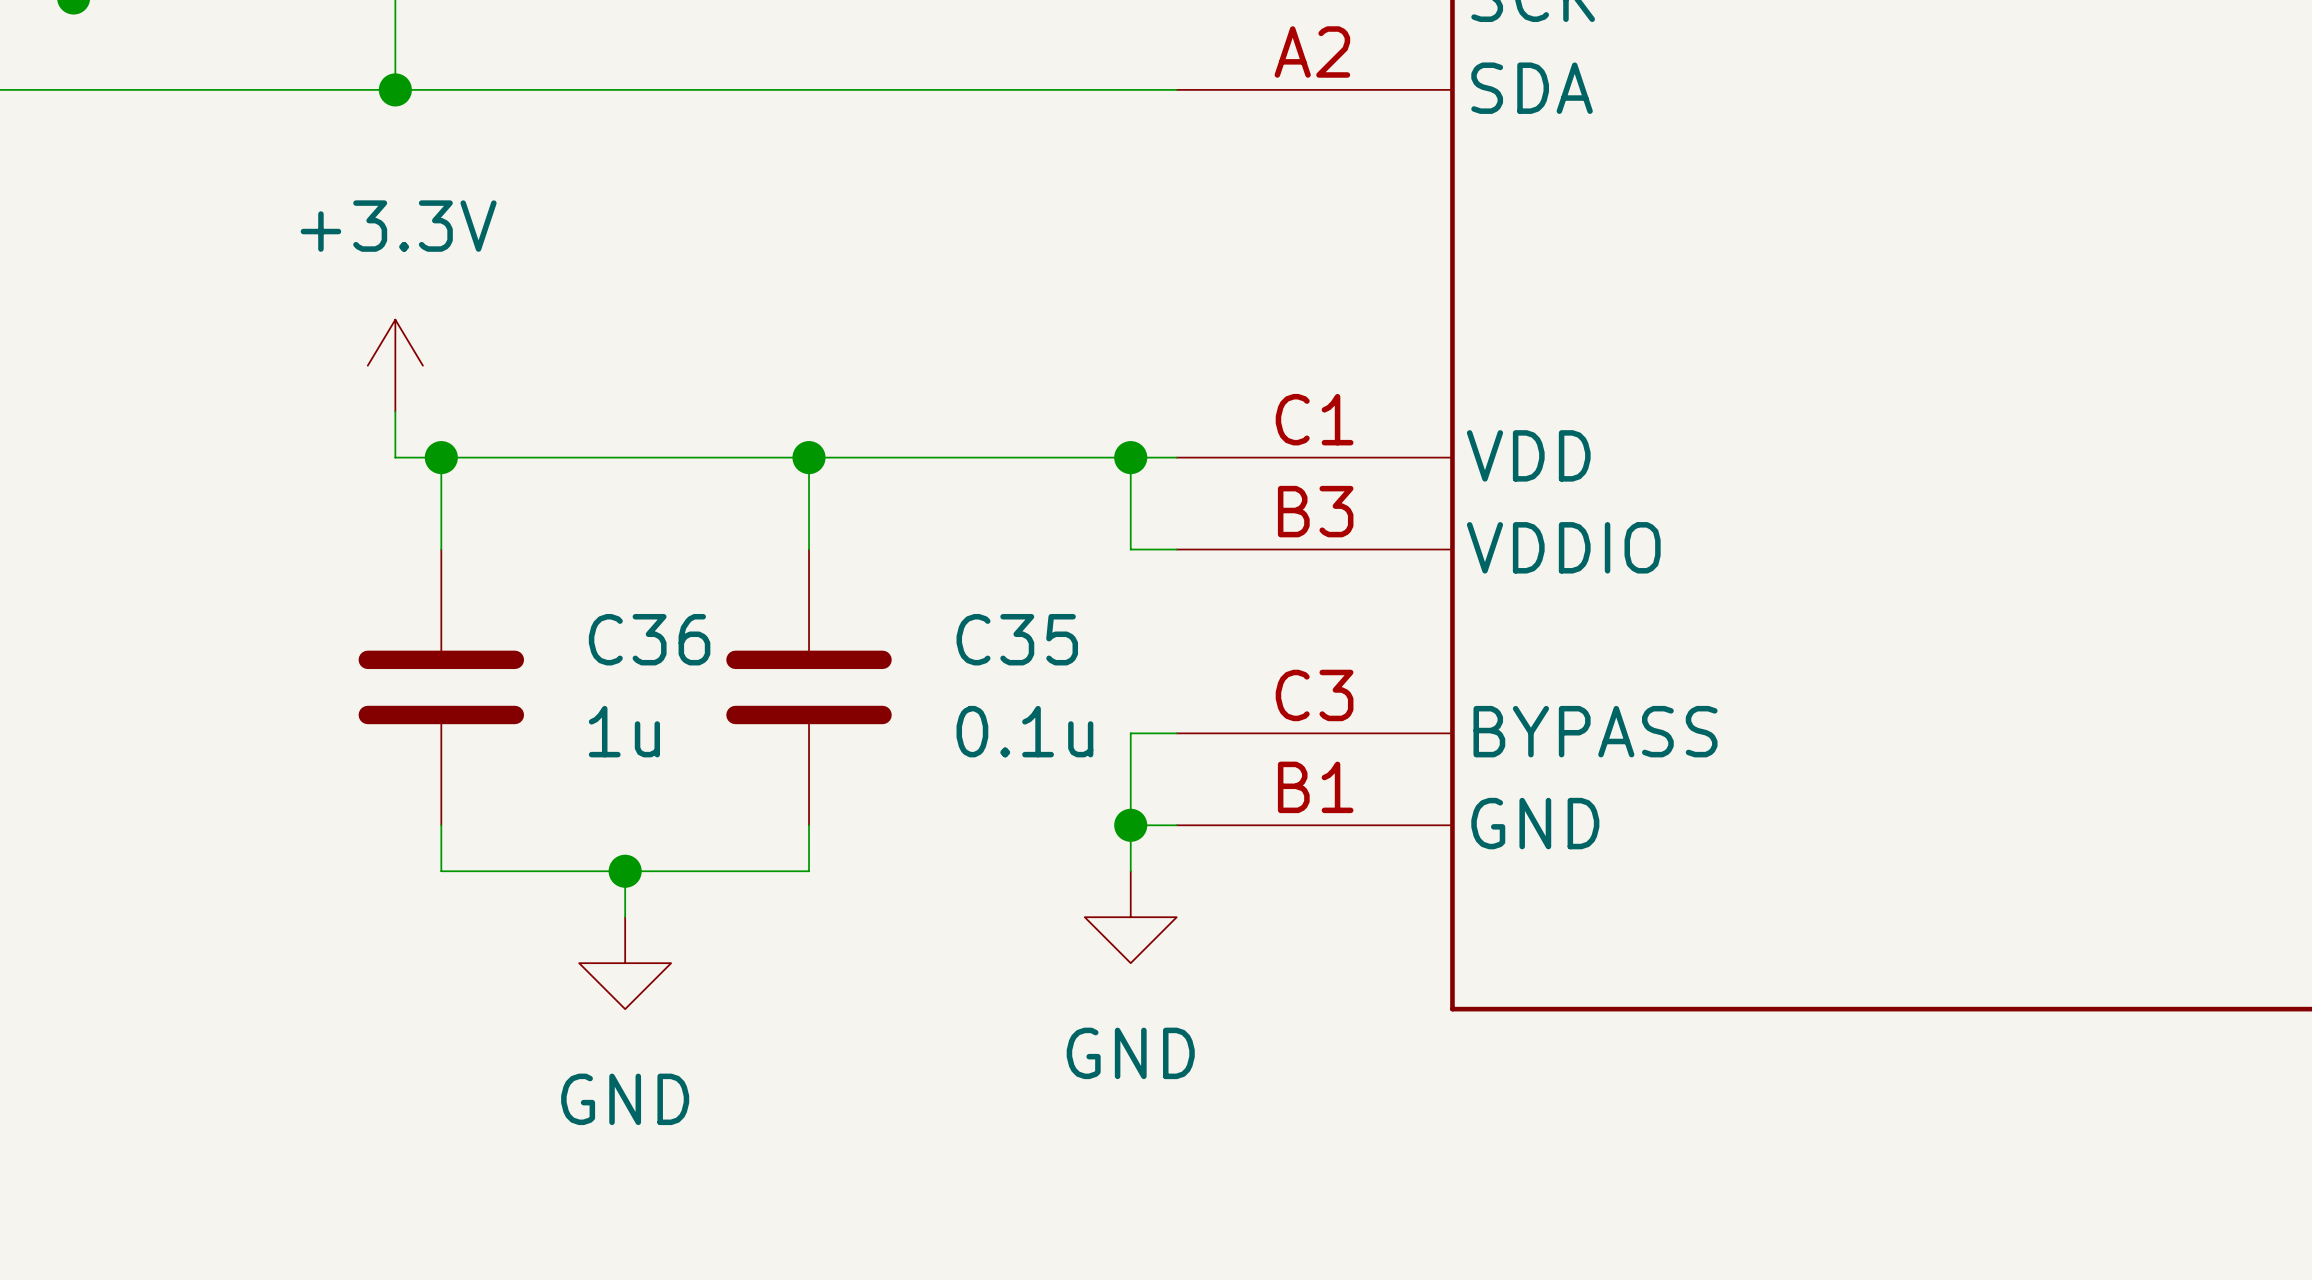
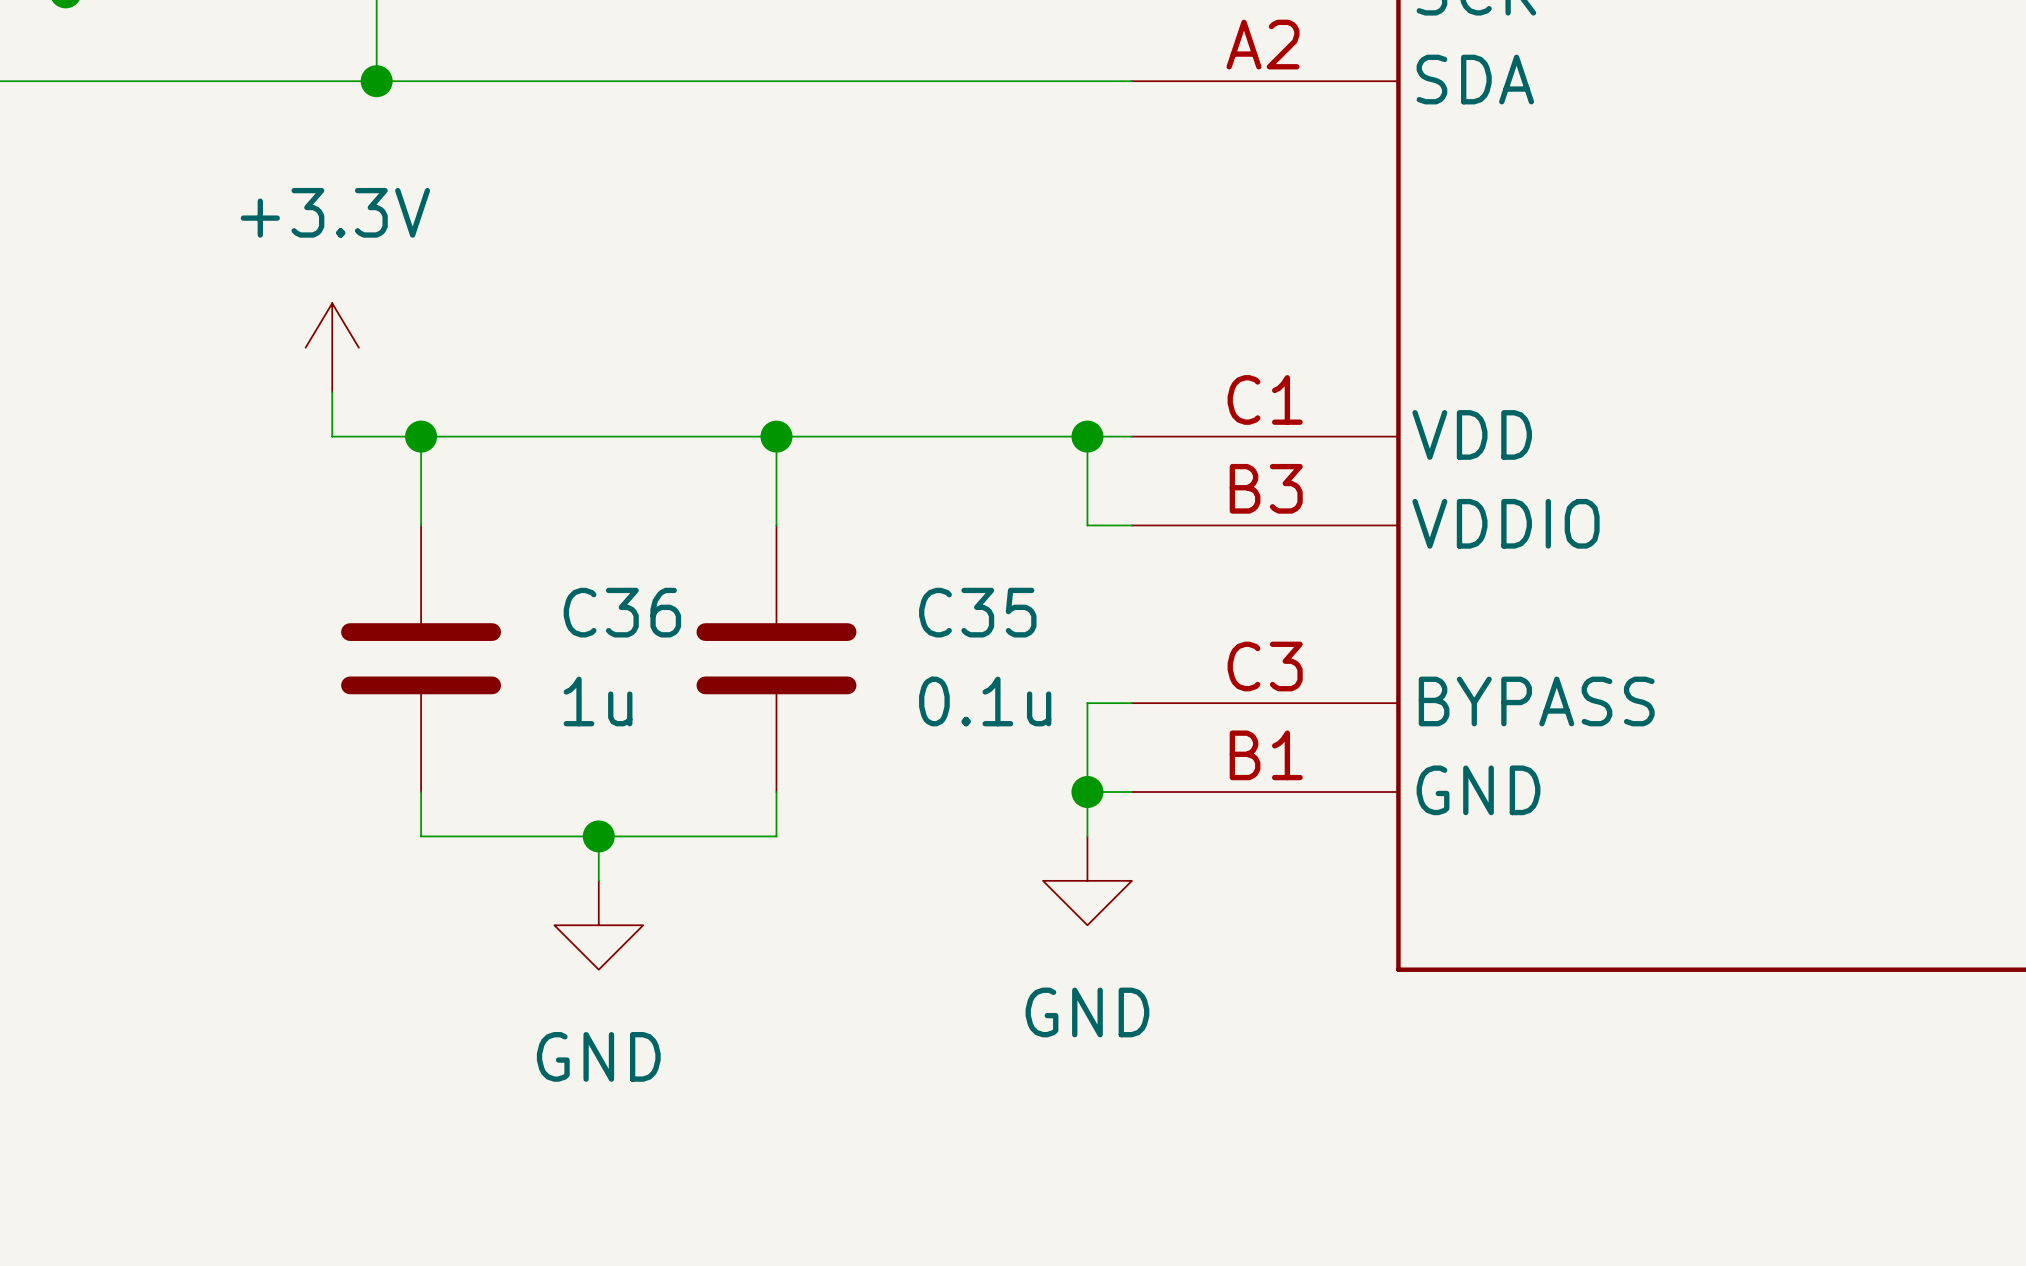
power symbol position: +3.3V (395, 365) -> +3.3V (332, 347)
wire: (395, 411) (395, 457) -> (332, 392) (332, 436) (376, 436)

